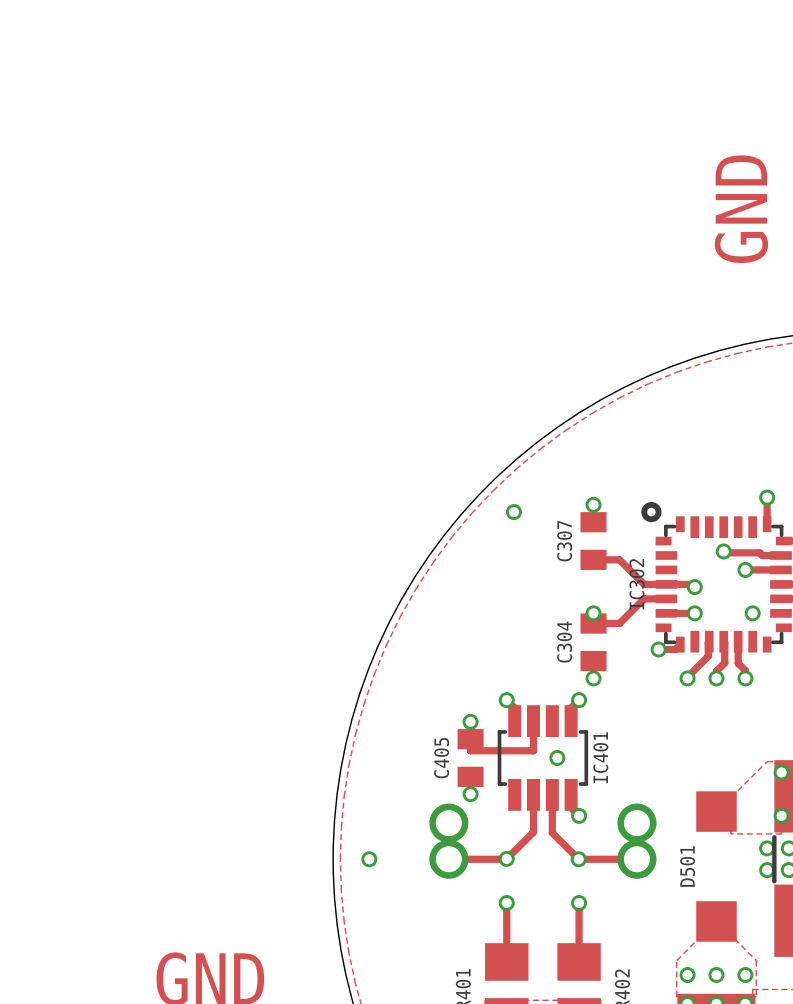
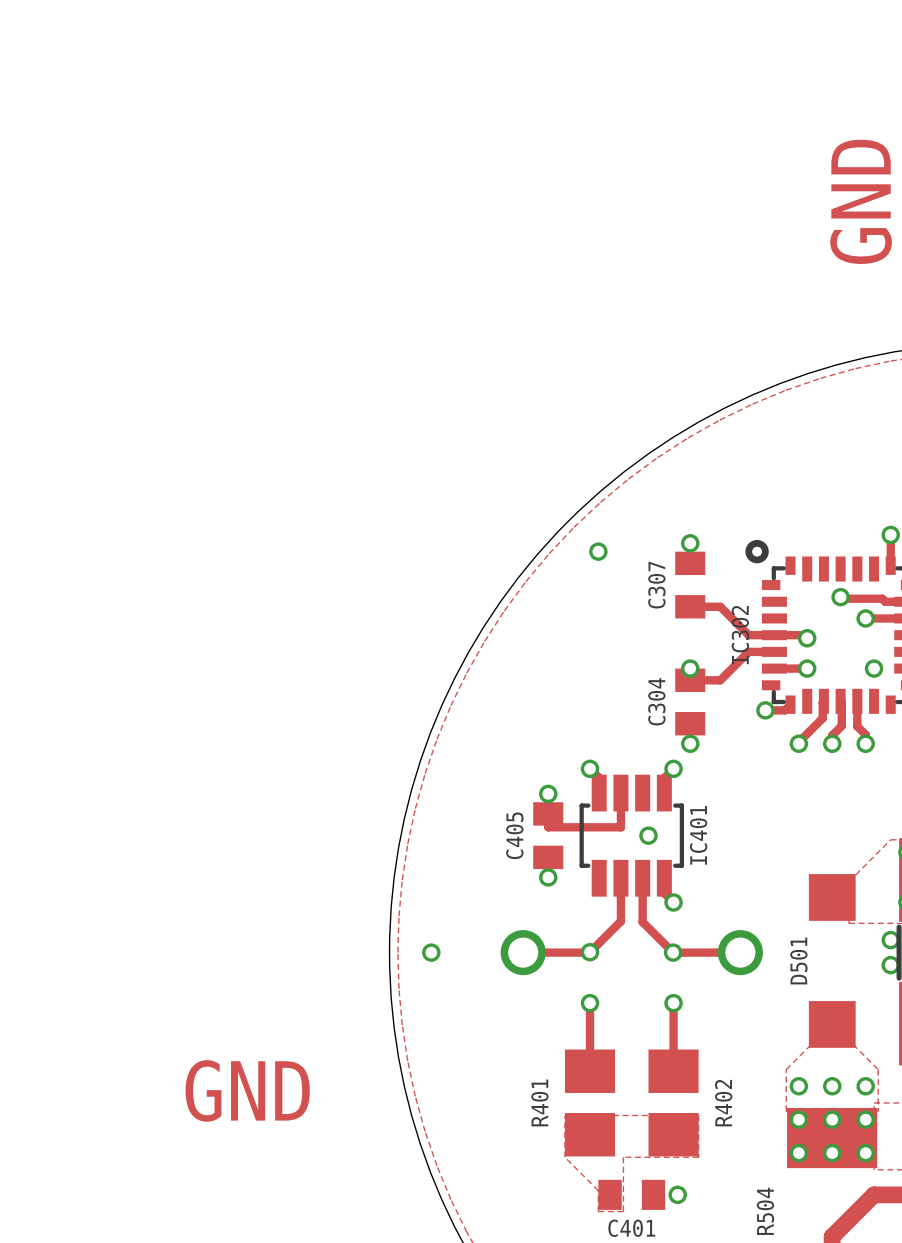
part: (448, 823) -> none
part: (636, 823) -> none

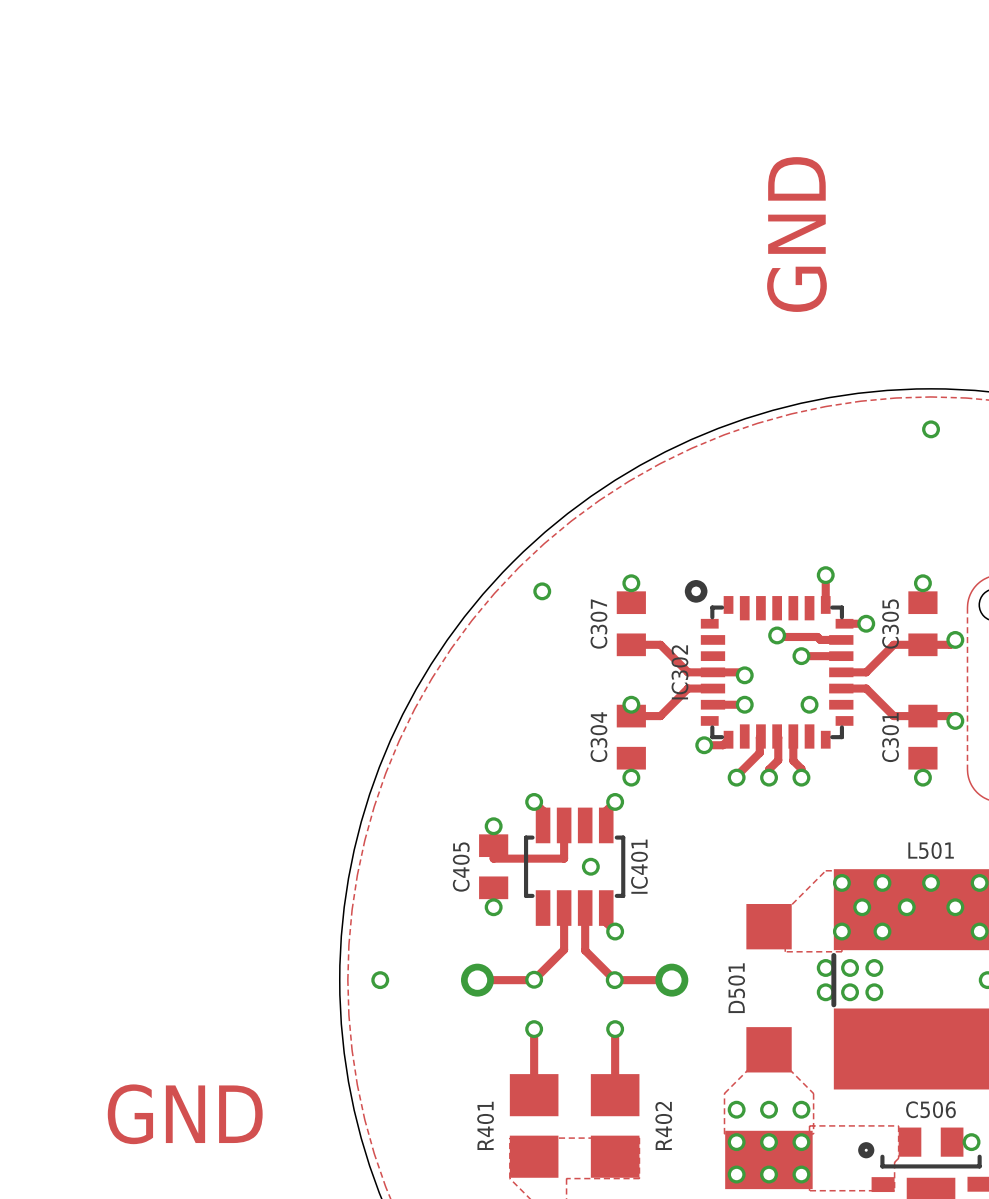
part footprint: [500, 930, 546, 976] -> [460, 963, 494, 997]
part footprint: [717, 930, 763, 976] -> [655, 963, 689, 997]

